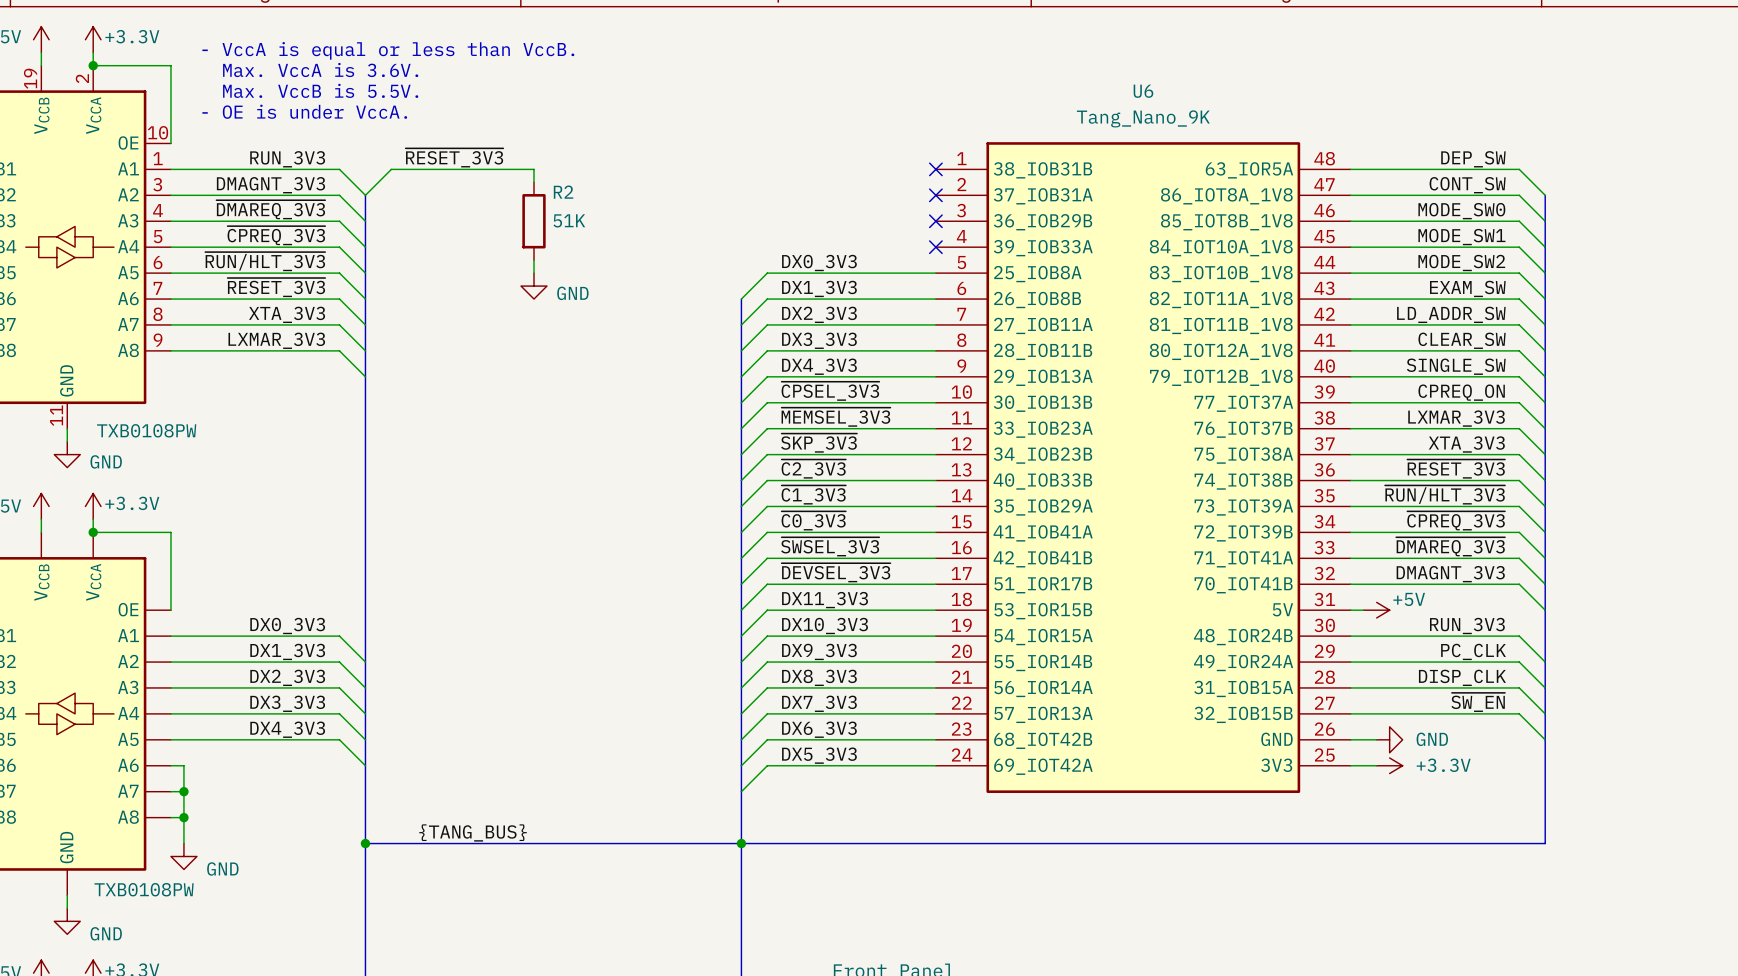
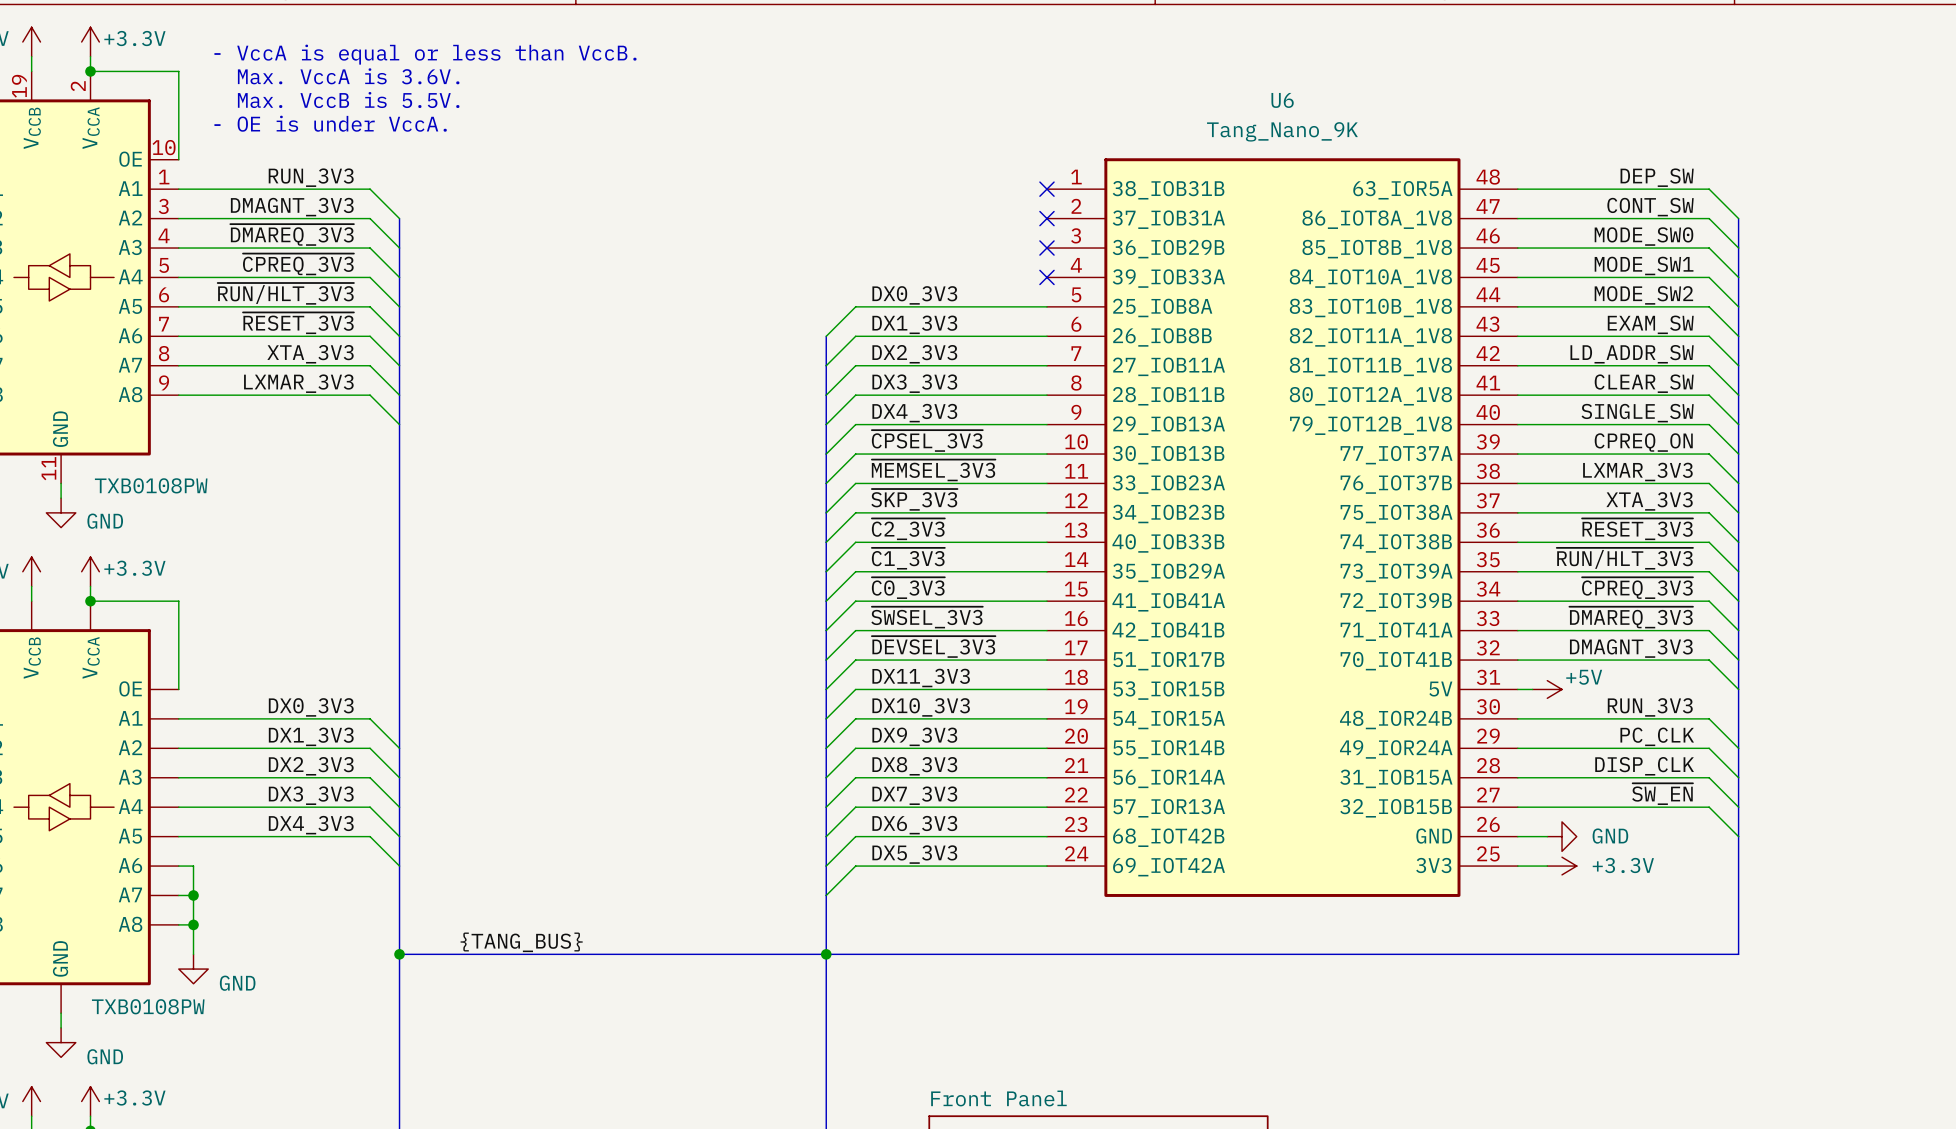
label: ~{RESET_3V3} (454, 157) -> none
wire: (533, 182) (533, 169) (391, 169) (365, 195) -> none
R2: 51K (533, 221) -> none
wire: (533, 260) (533, 273) -> none
power symbol: GND (533, 286) -> none

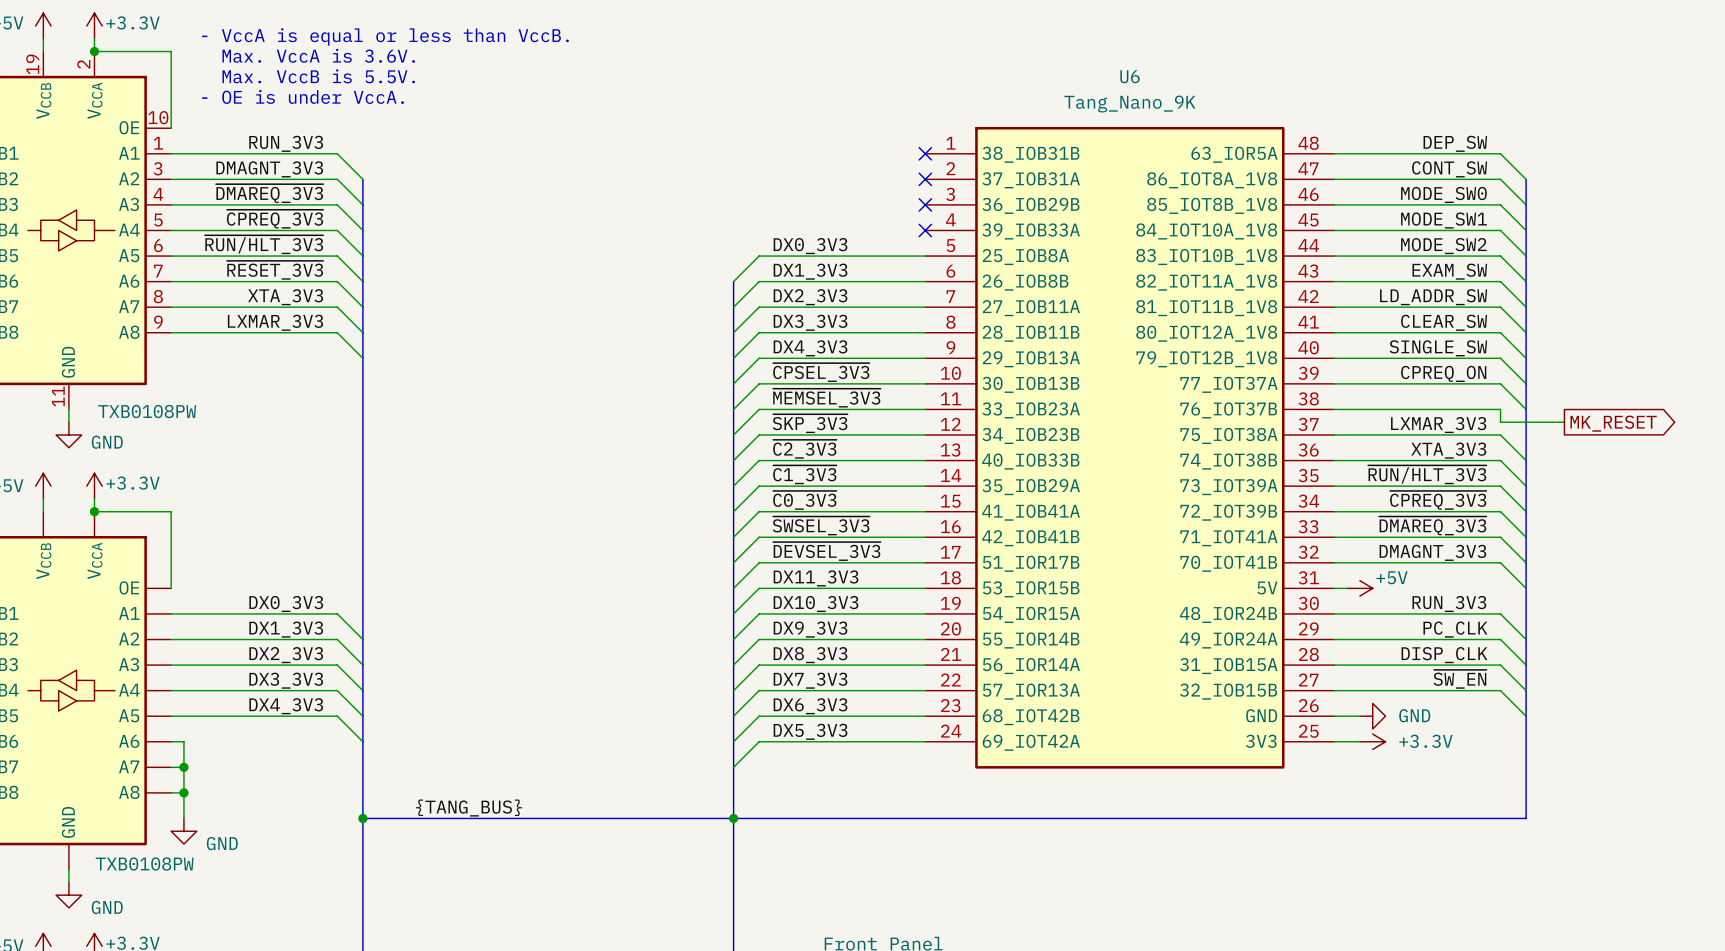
label: LXMAR_3V3 (1637, 471) -> none
wire: (1709, 483) (1738, 512) -> (1500, 409) (1500, 422) (1564, 422)
global label: none -> MK_RESET (1613, 423)
label: XTA_3V3 (1649, 501) -> LXMAR_3V3 (1438, 425)
label: ~{RESET_3V3} (1637, 529) -> XTA_3V3 (1448, 450)

